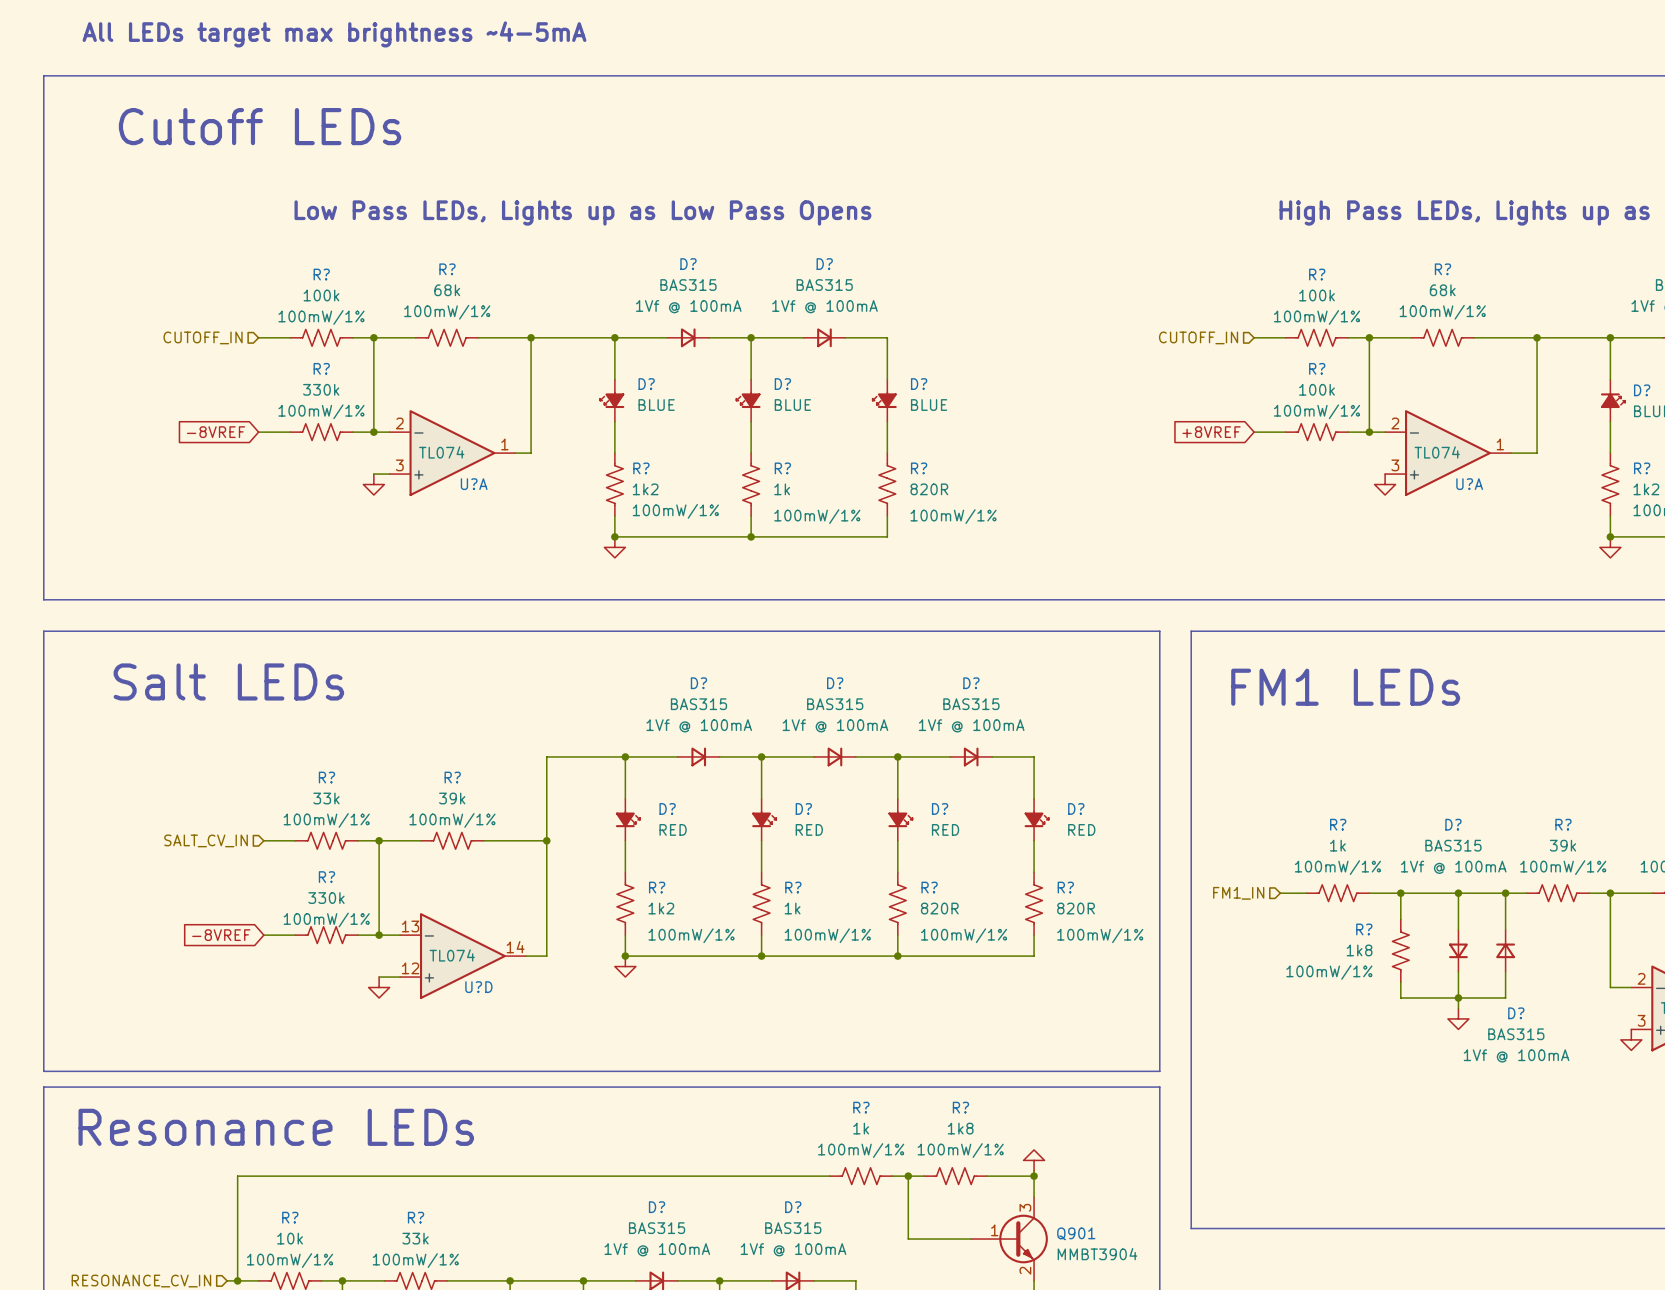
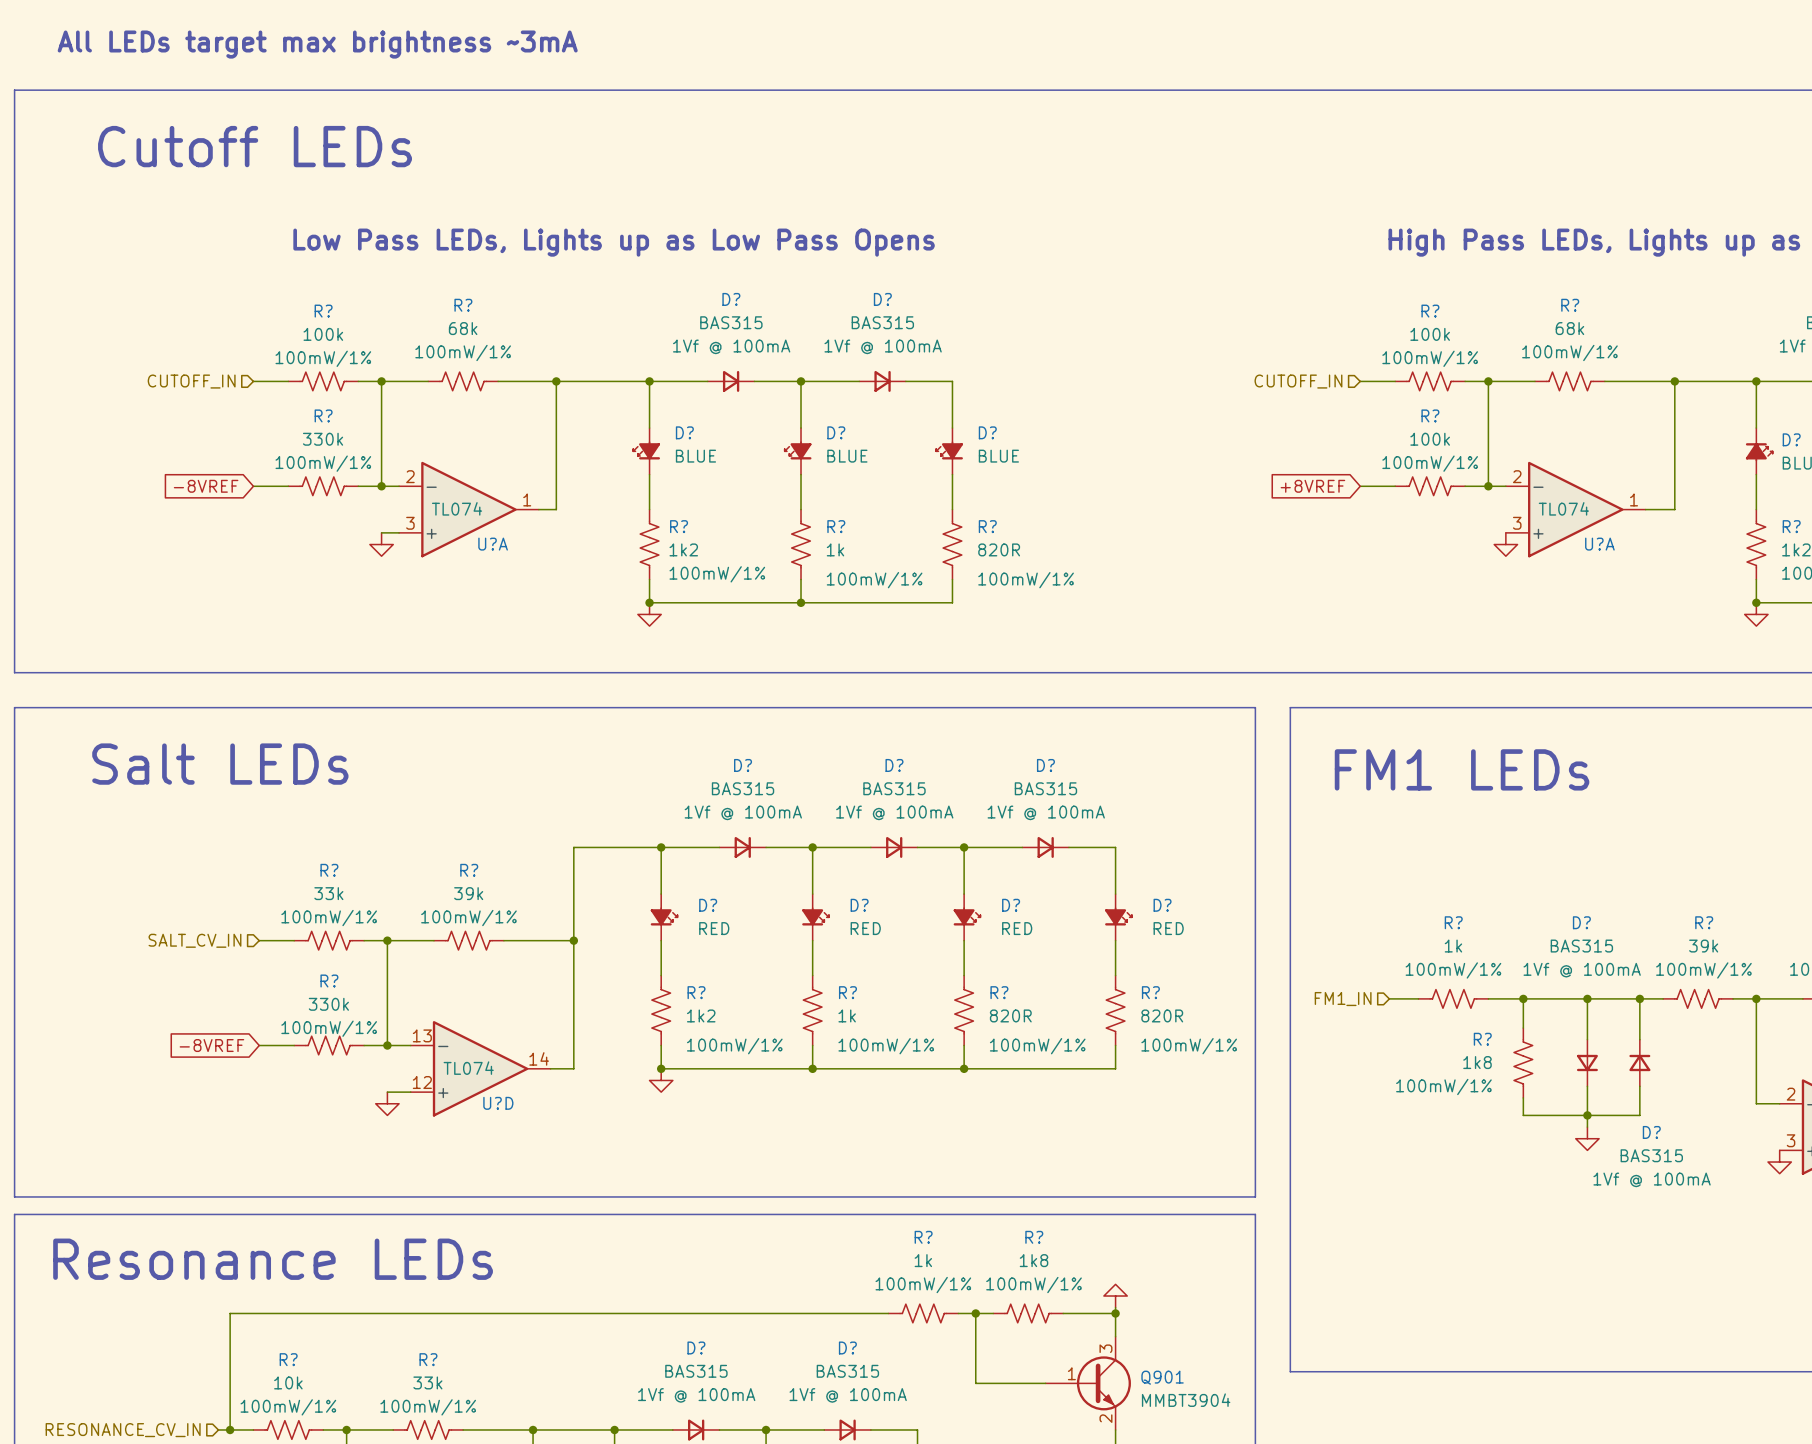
text: All LEDs target max brightness ~4-5mA (334, 34) -> All LEDs target max brightness ~3mA (317, 44)

